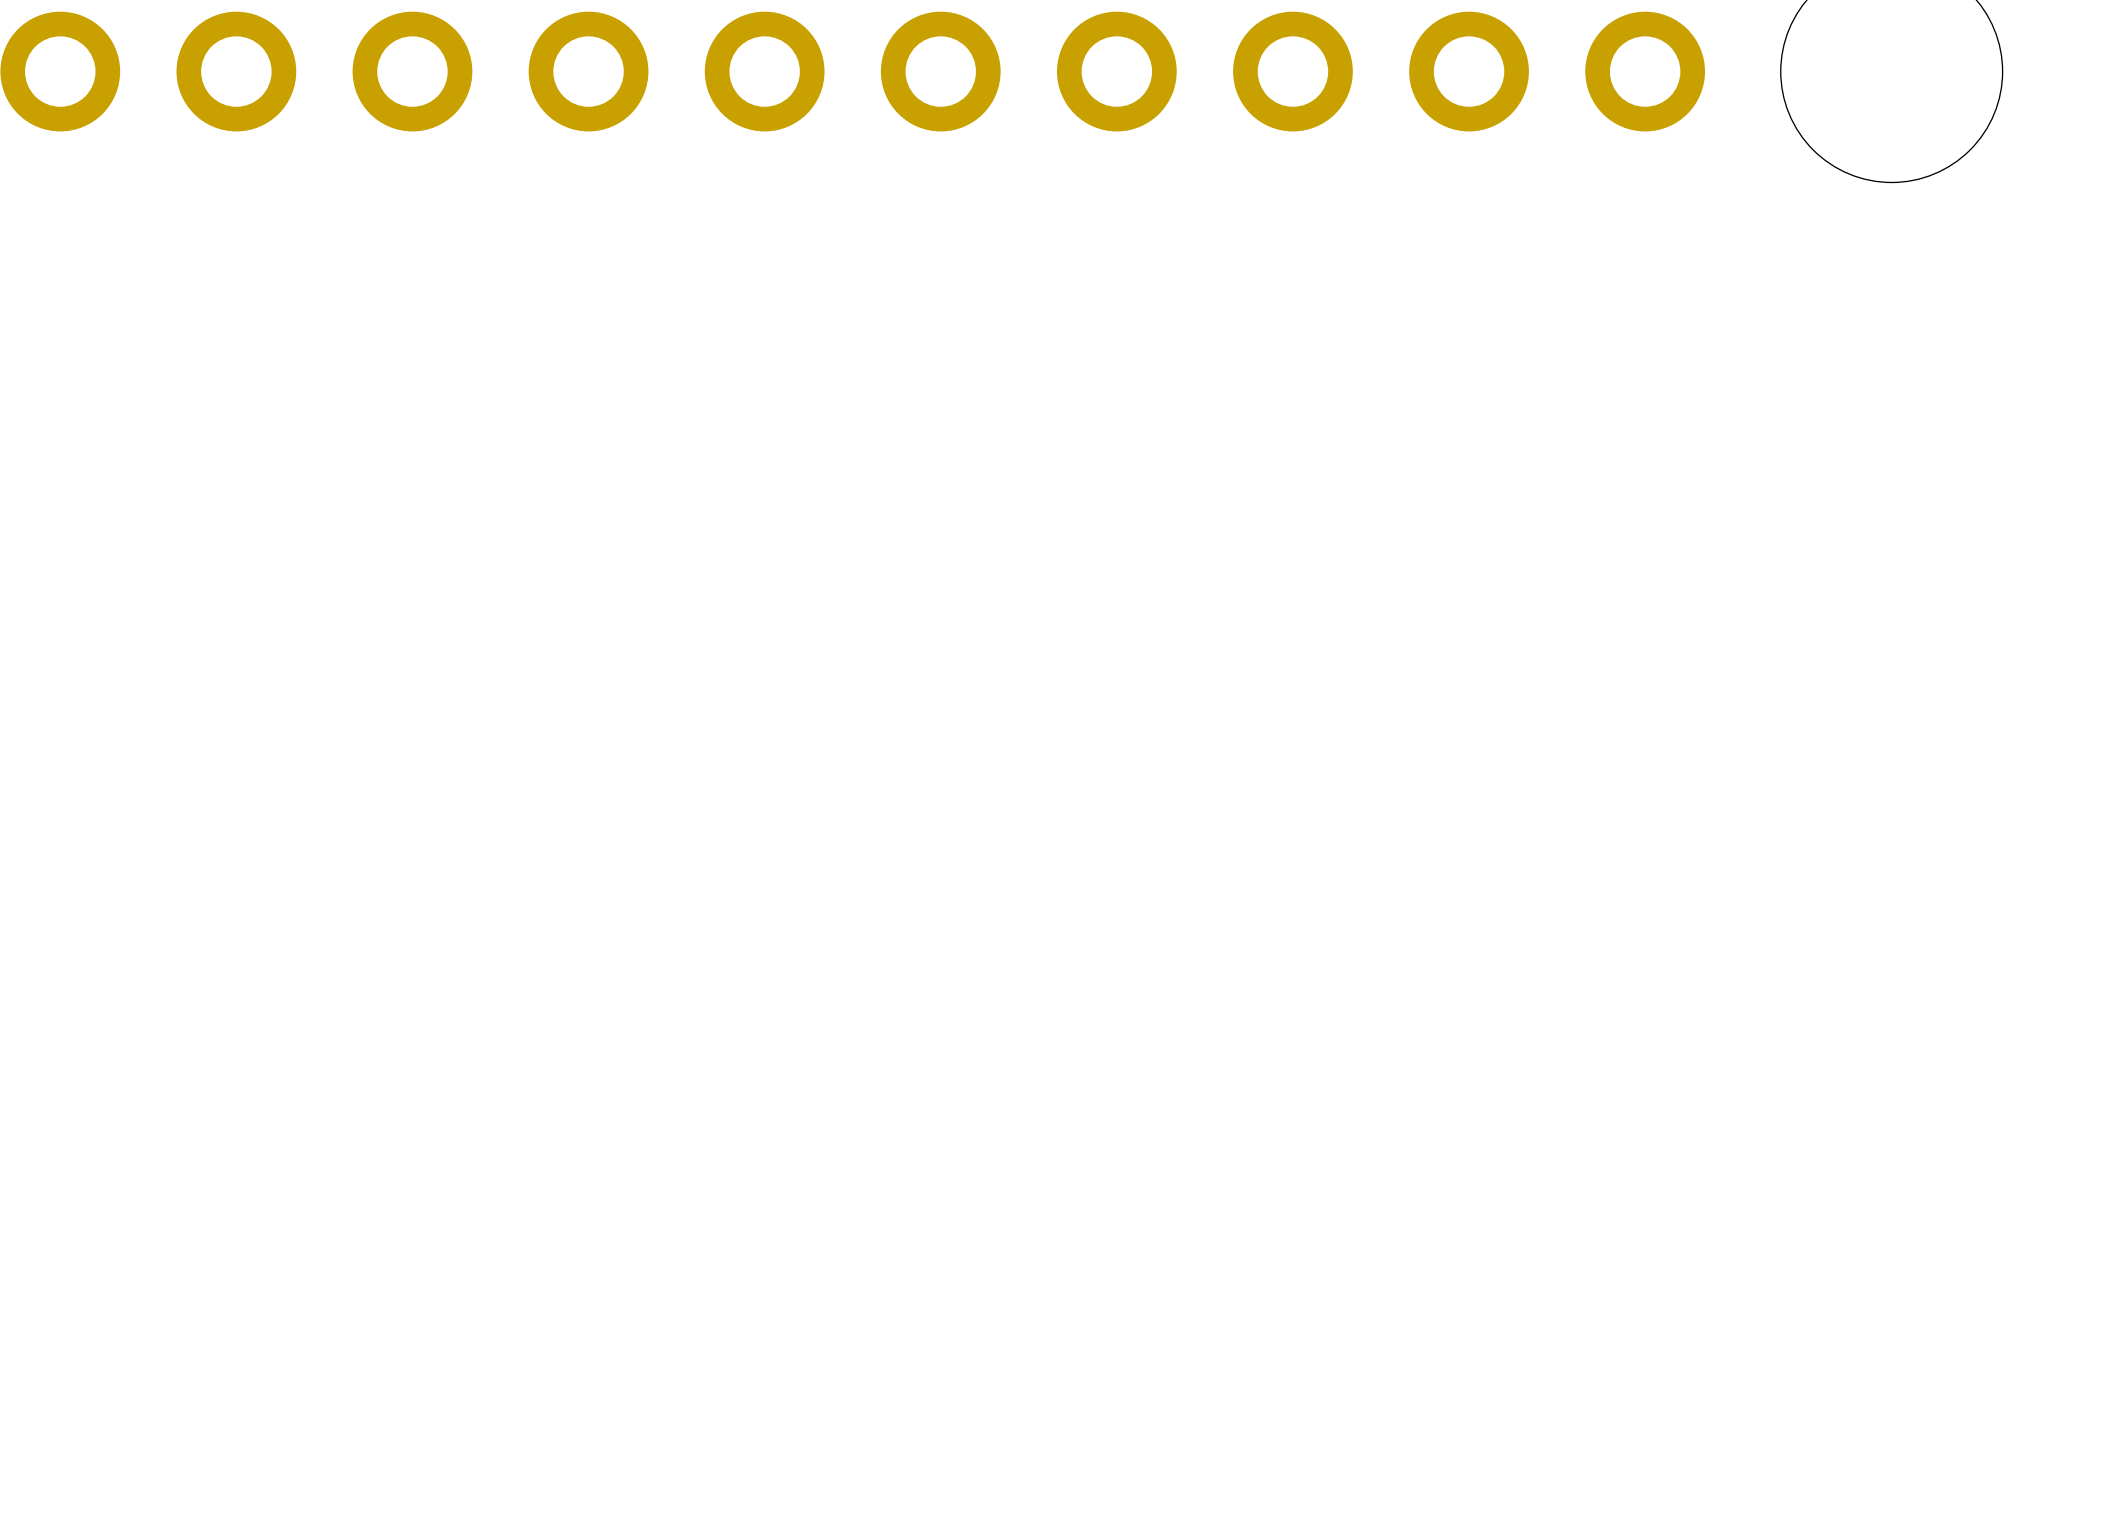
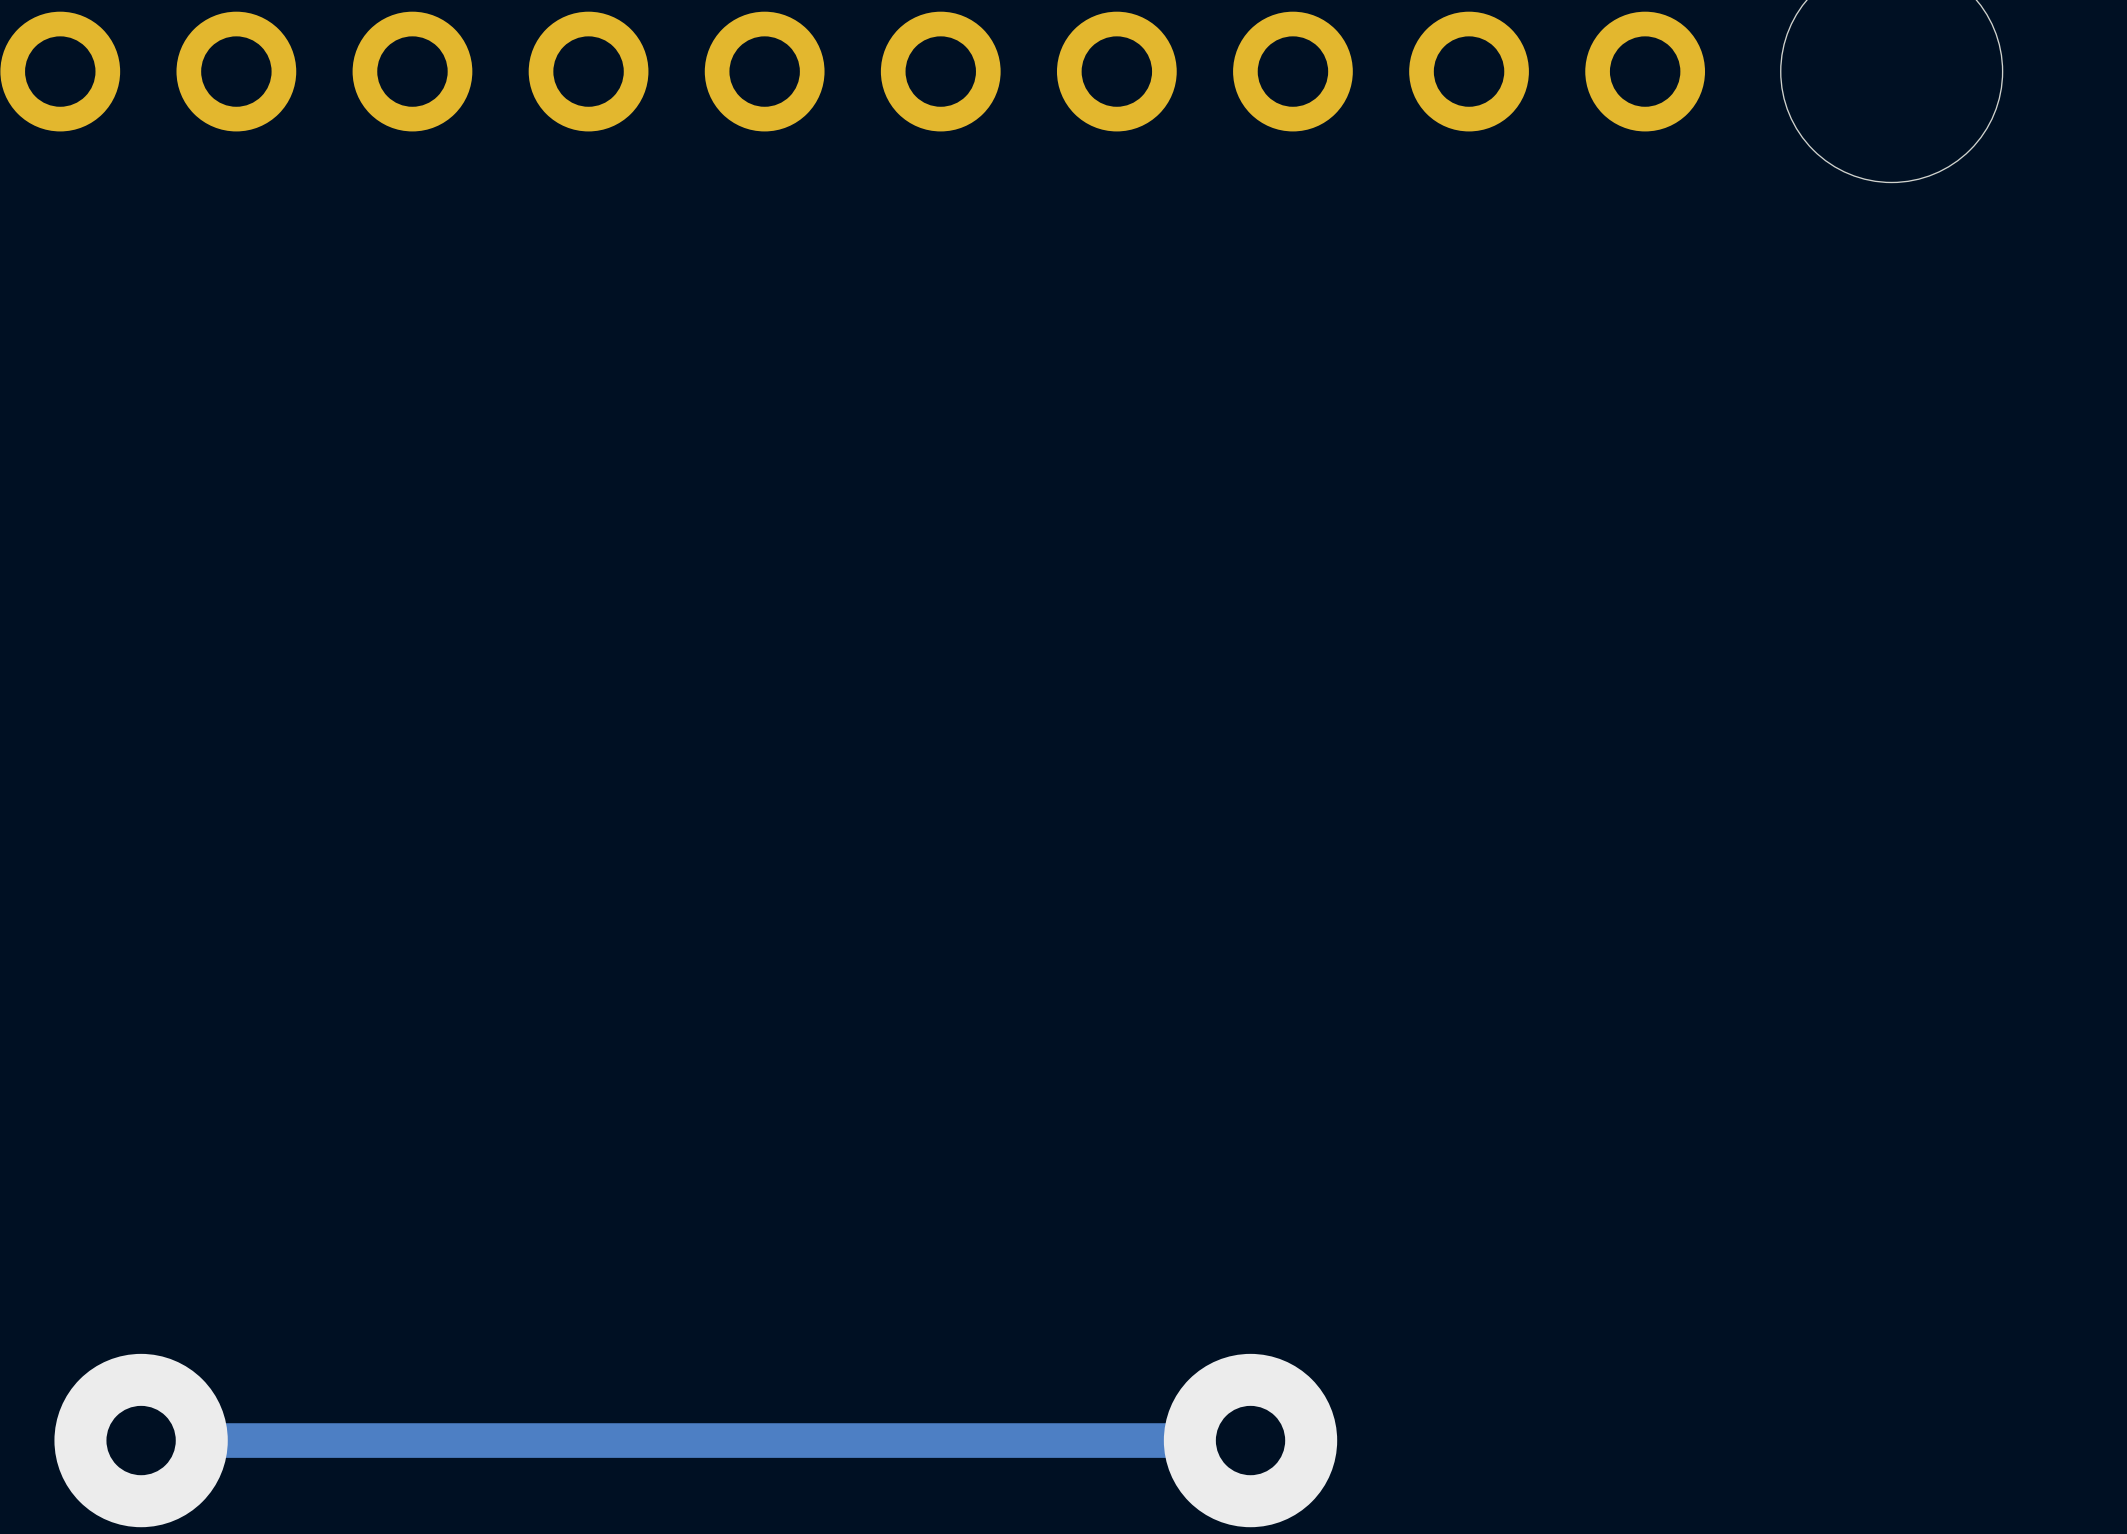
via: none -> (141, 1440)
track: none -> (1250, 1440) (141, 1440)
via: none -> (1250, 1440)

